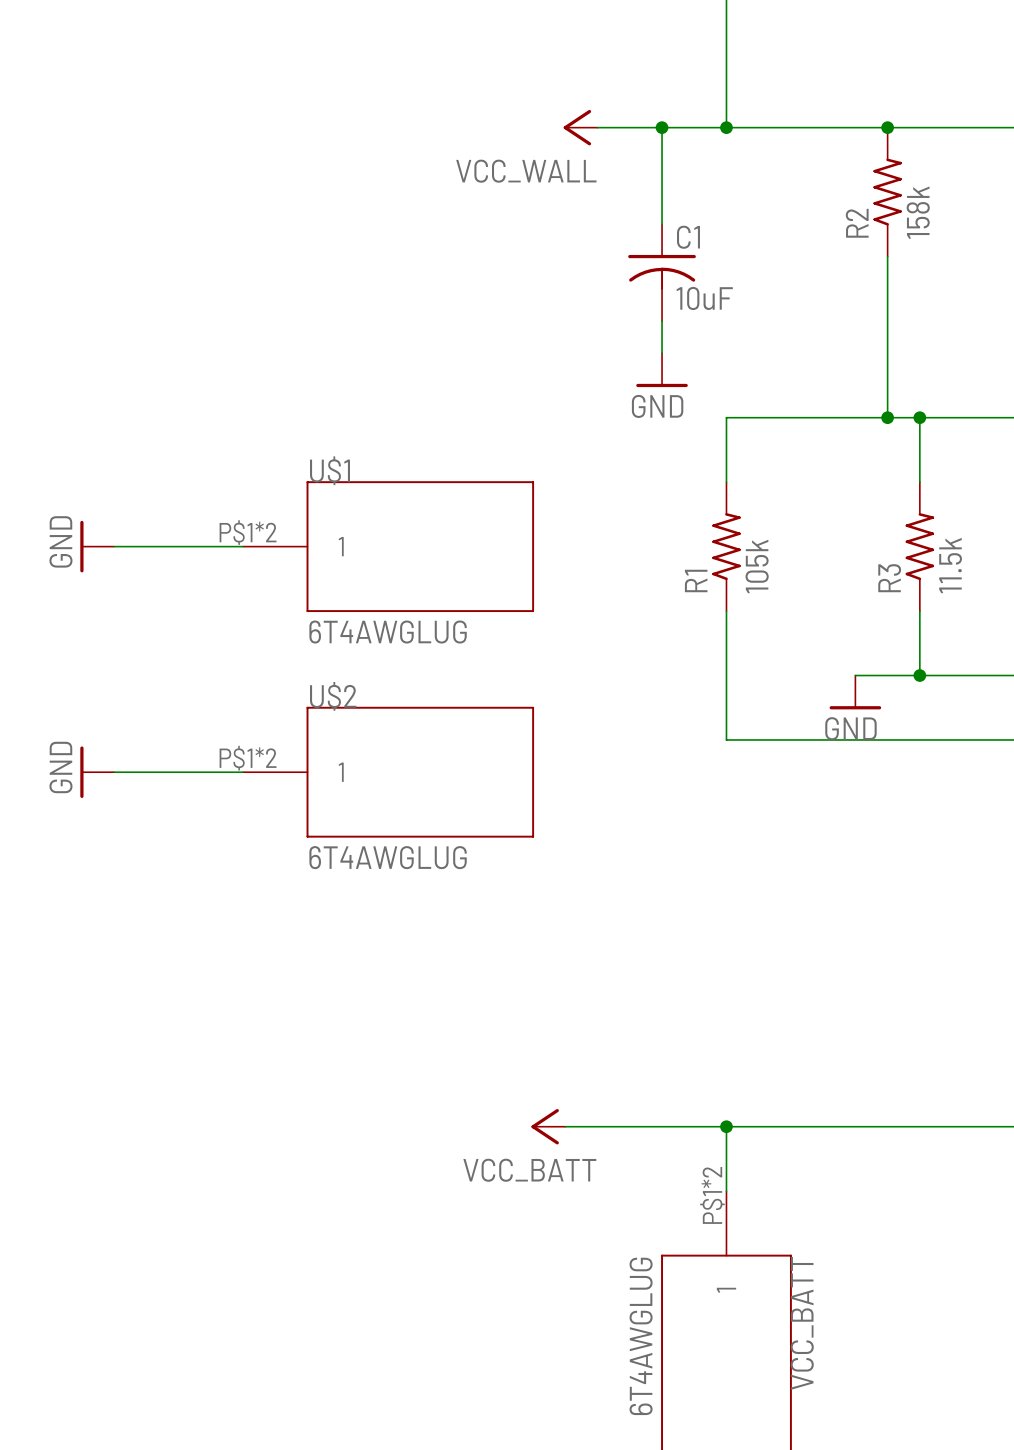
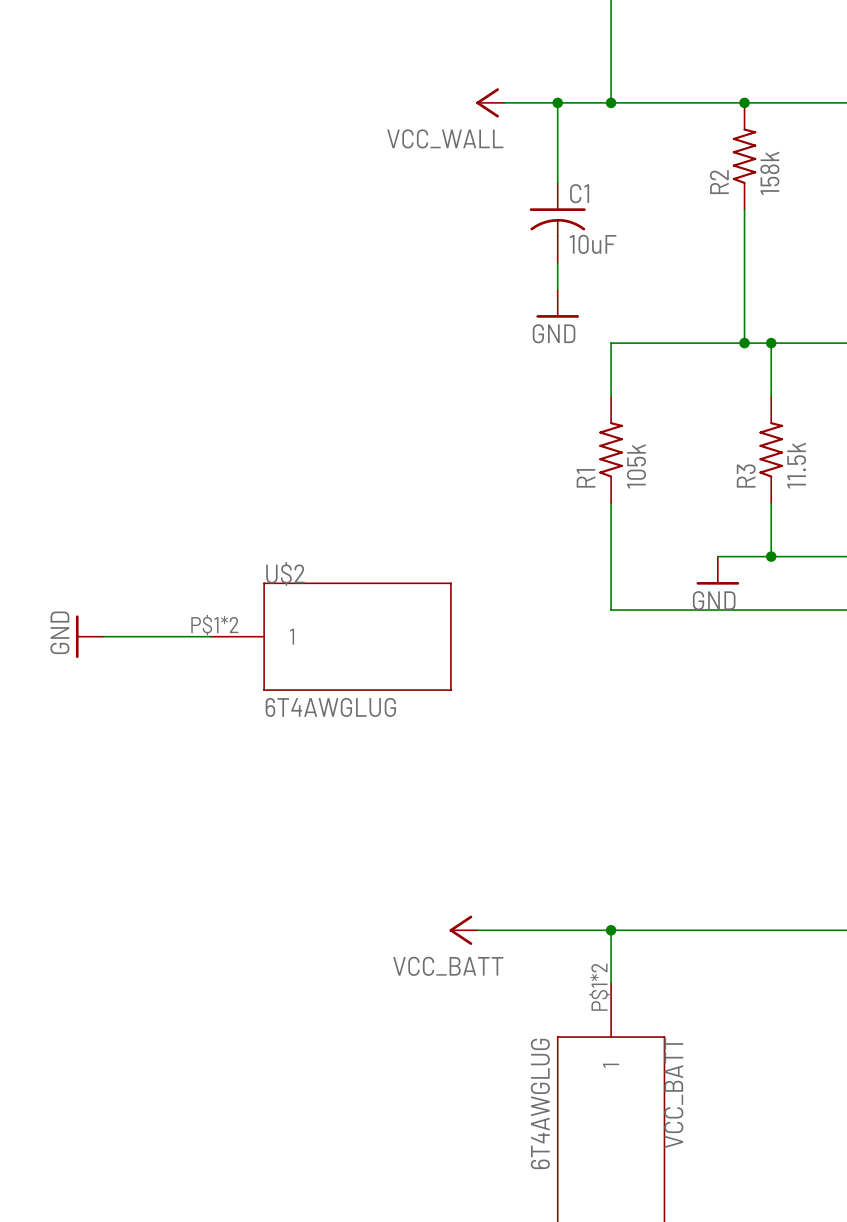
power symbol: GND (97, 546) -> none
wire: (114, 546) (243, 546) -> none
U$1: 6T4AWGLUG (388, 546) -> none

